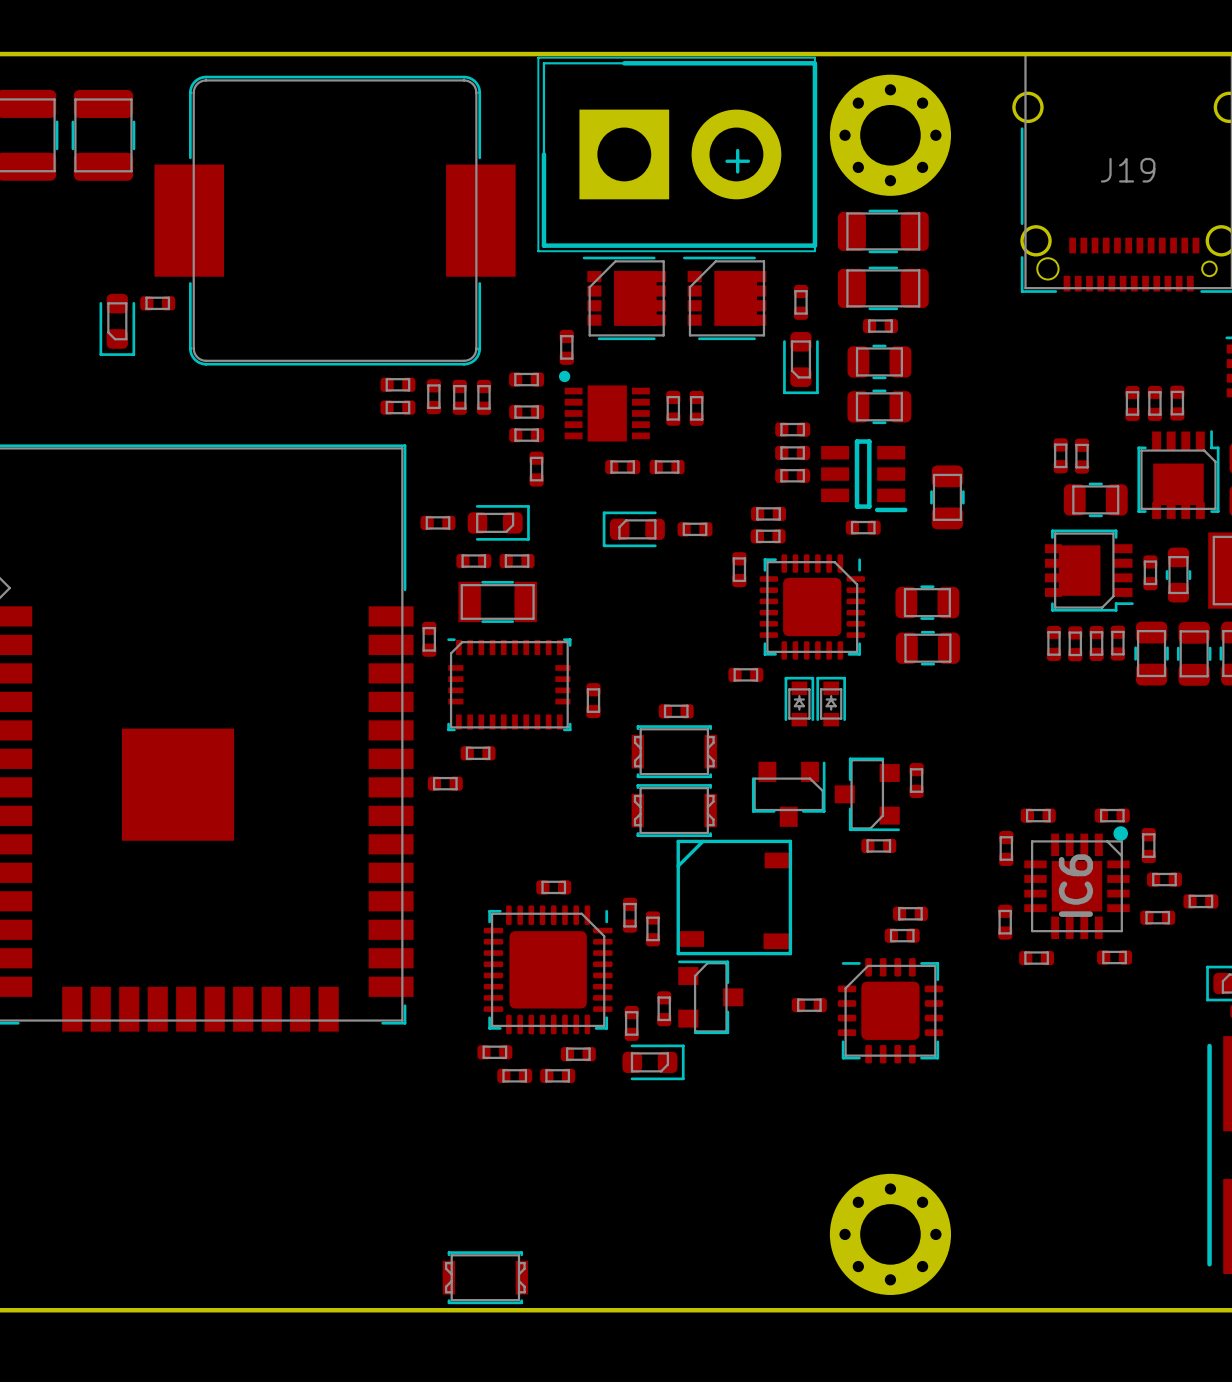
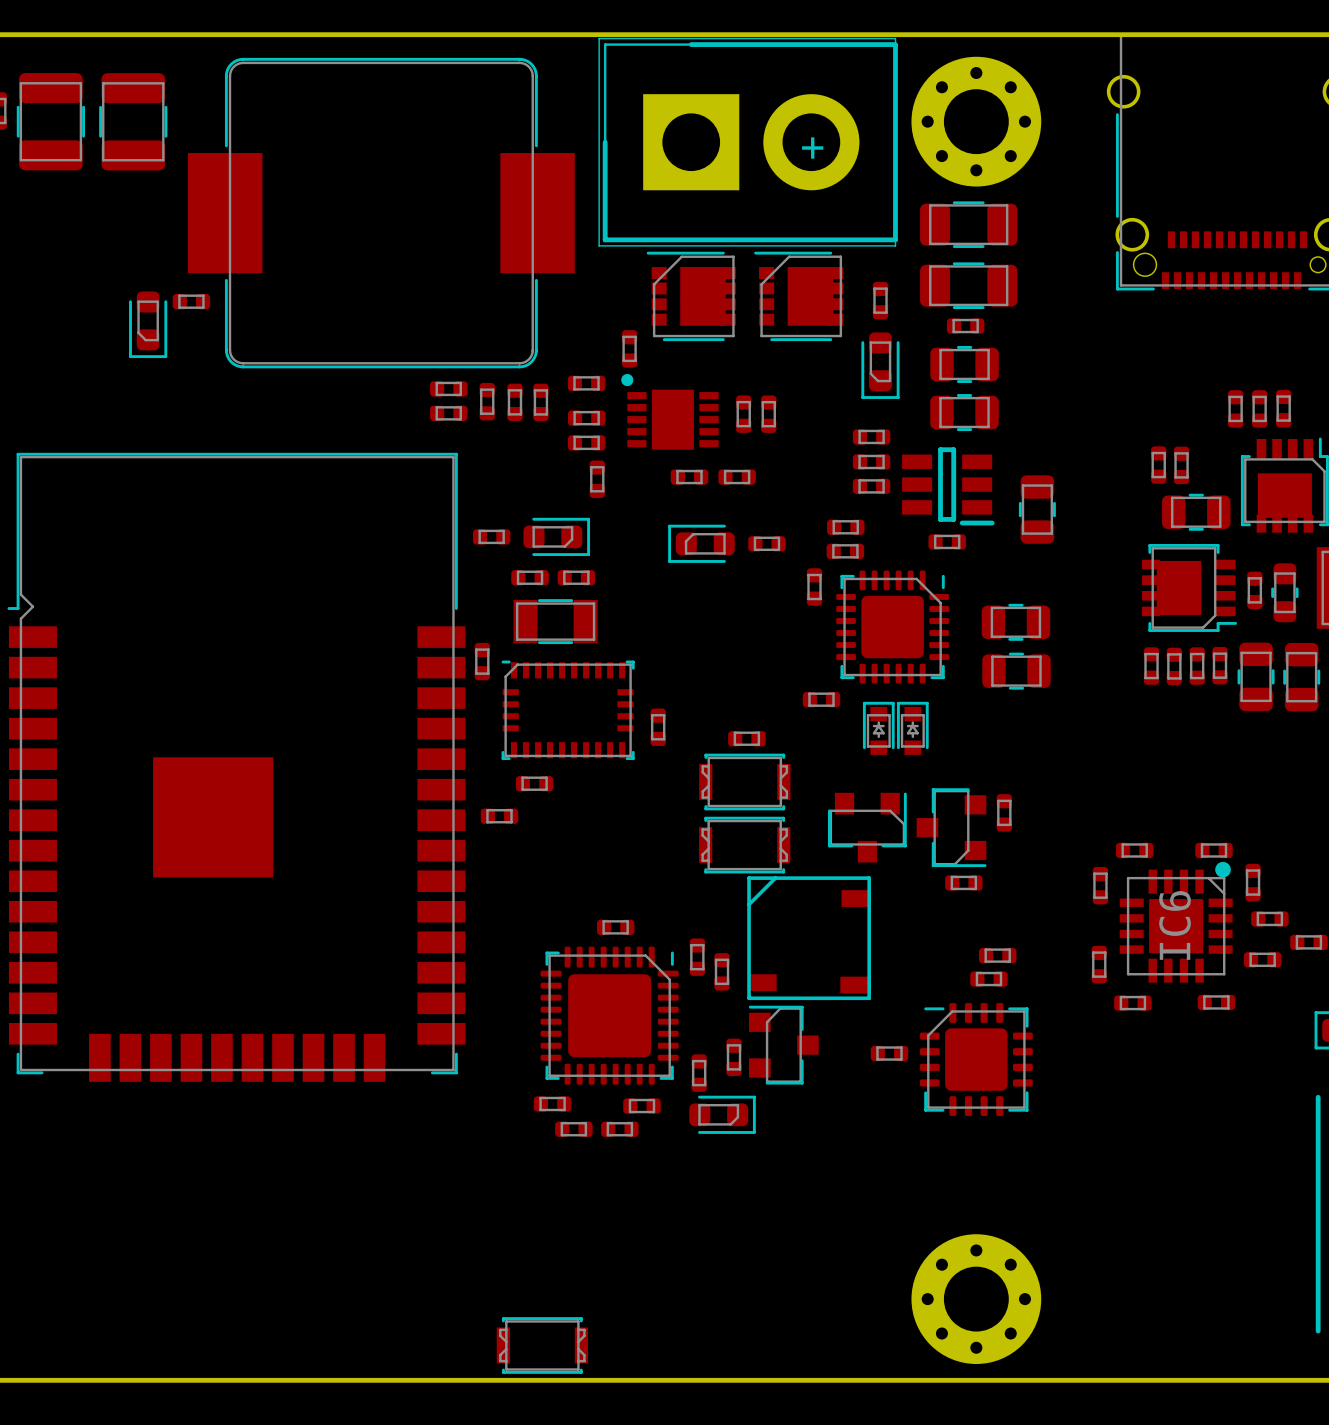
J19 name: J19 (1128, 170) -> none

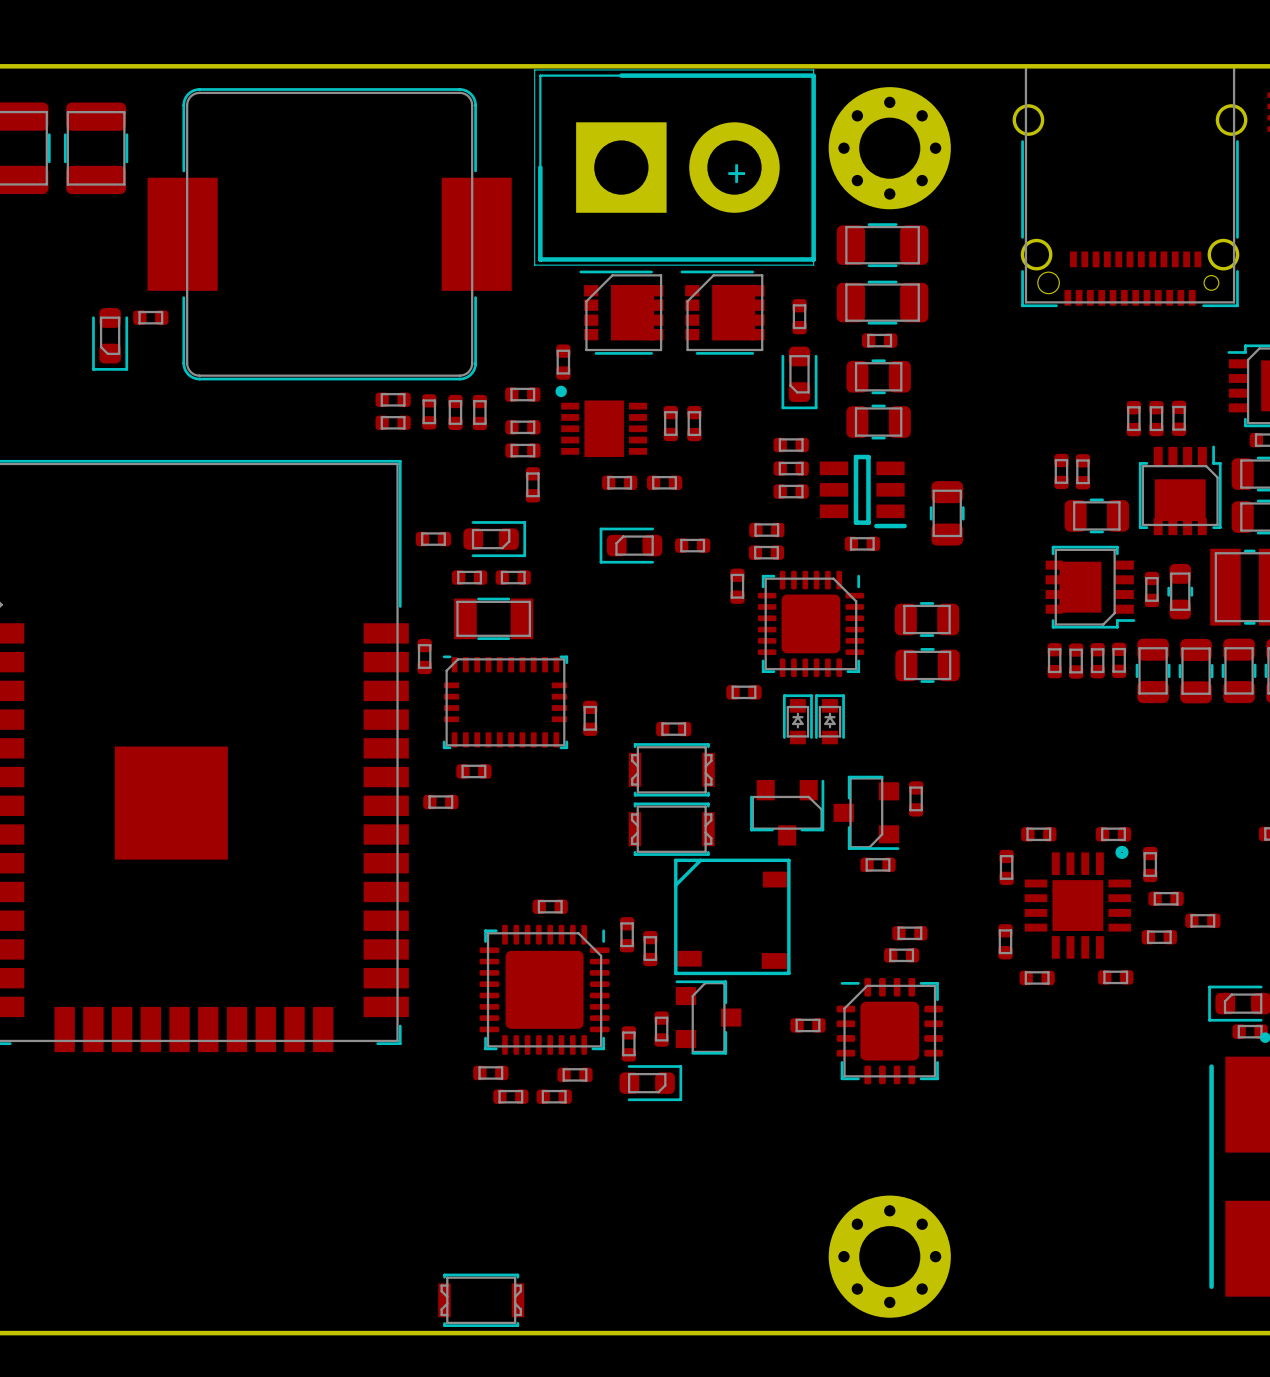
IC6: (1176, 922) -> none
part: none -> (1077, 902)

